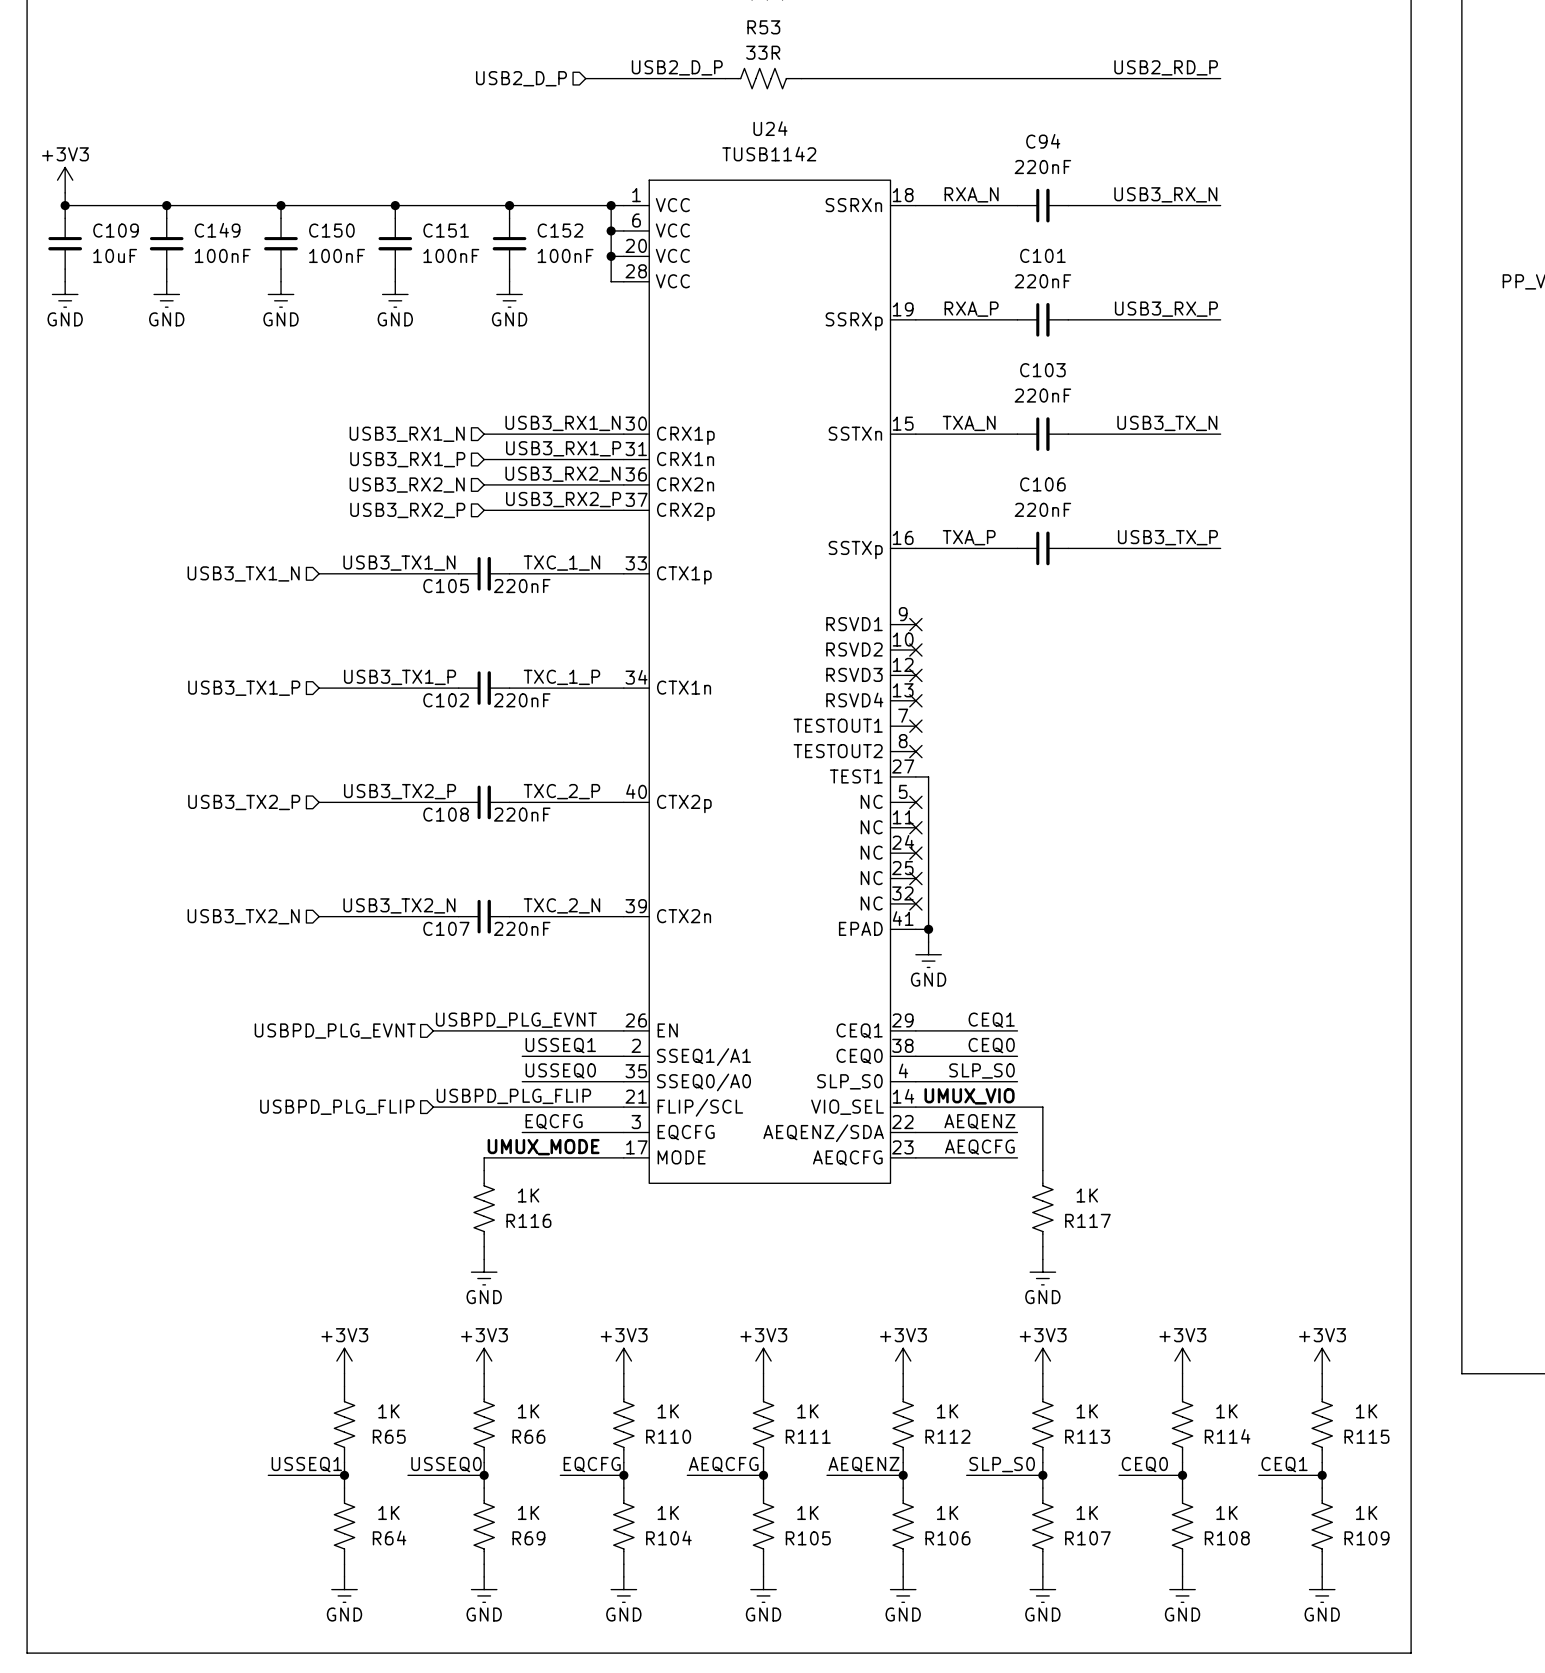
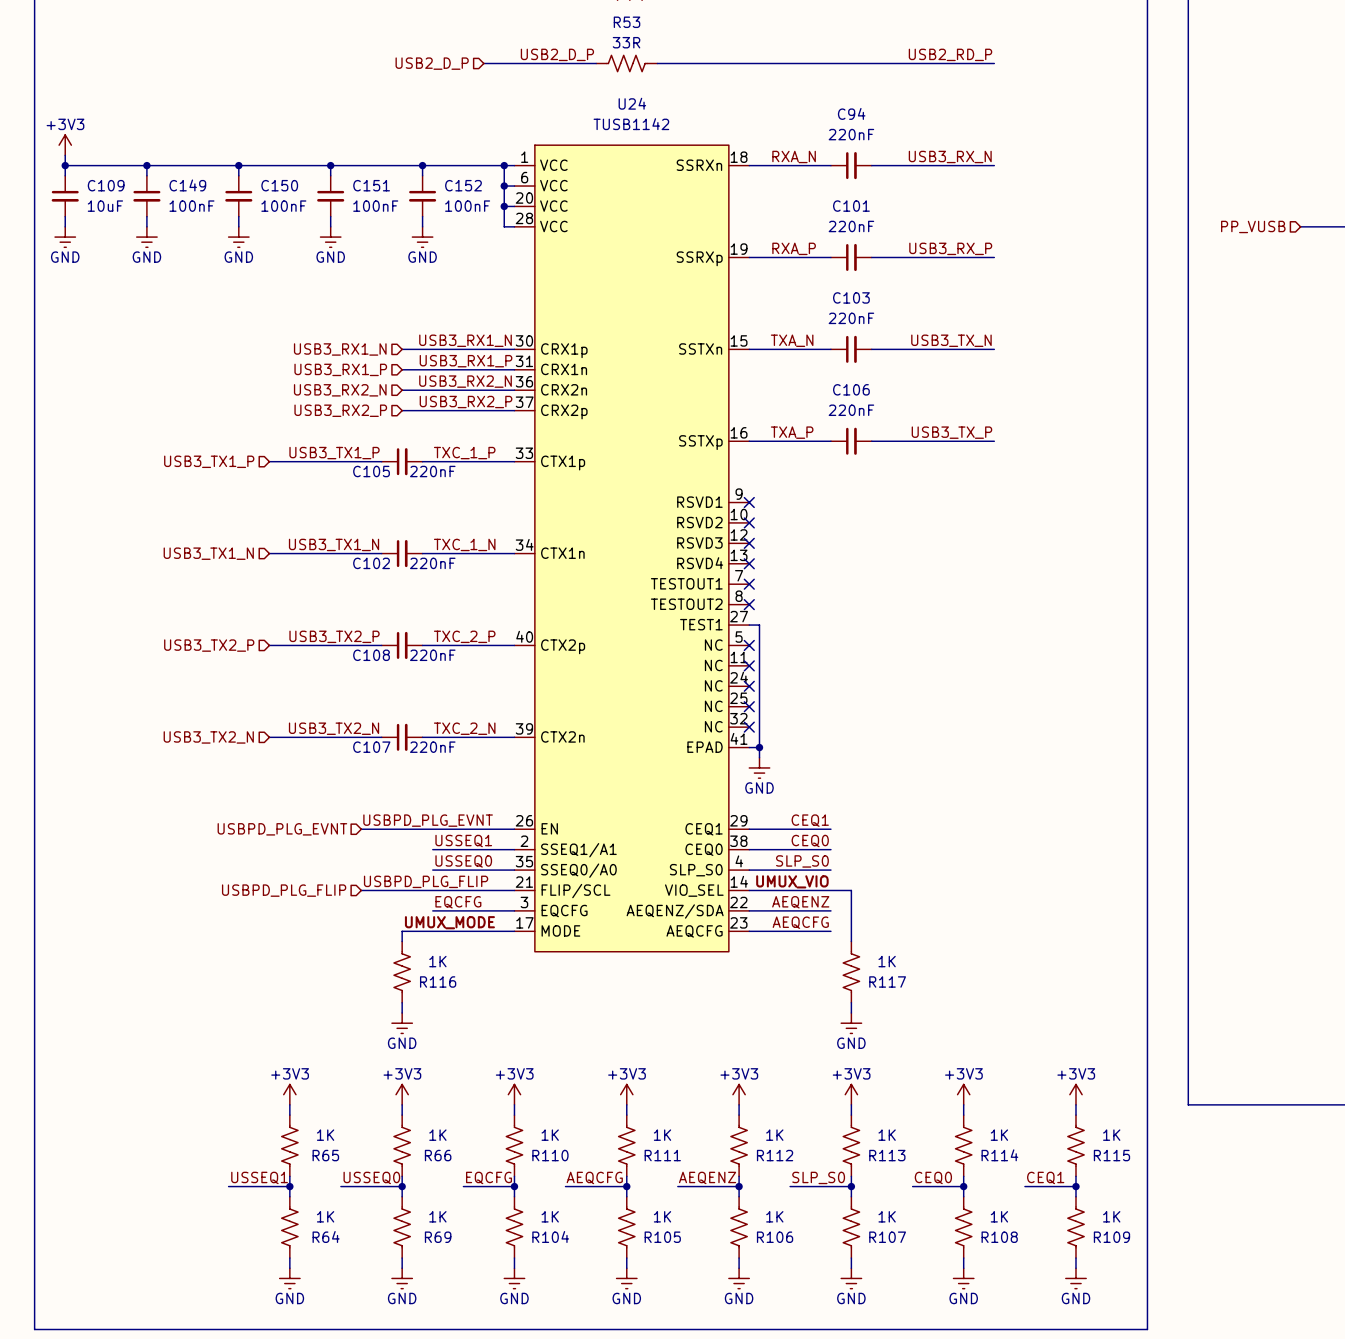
label: USB3_TX1_N (399, 563) -> USB3_TX1_P (334, 453)
label: TXC_1_N (561, 563) -> TXC_1_P (464, 453)
hierarchical label: USB3_TX1_N (243, 573) -> USB3_TX1_P (209, 461)
label: USB3_TX1_P (400, 677) -> USB3_TX1_N (334, 544)
label: TXC_1_P (561, 677) -> TXC_1_N (464, 544)
hierarchical label: USB3_TX1_P (244, 688) -> USB3_TX1_N (208, 553)

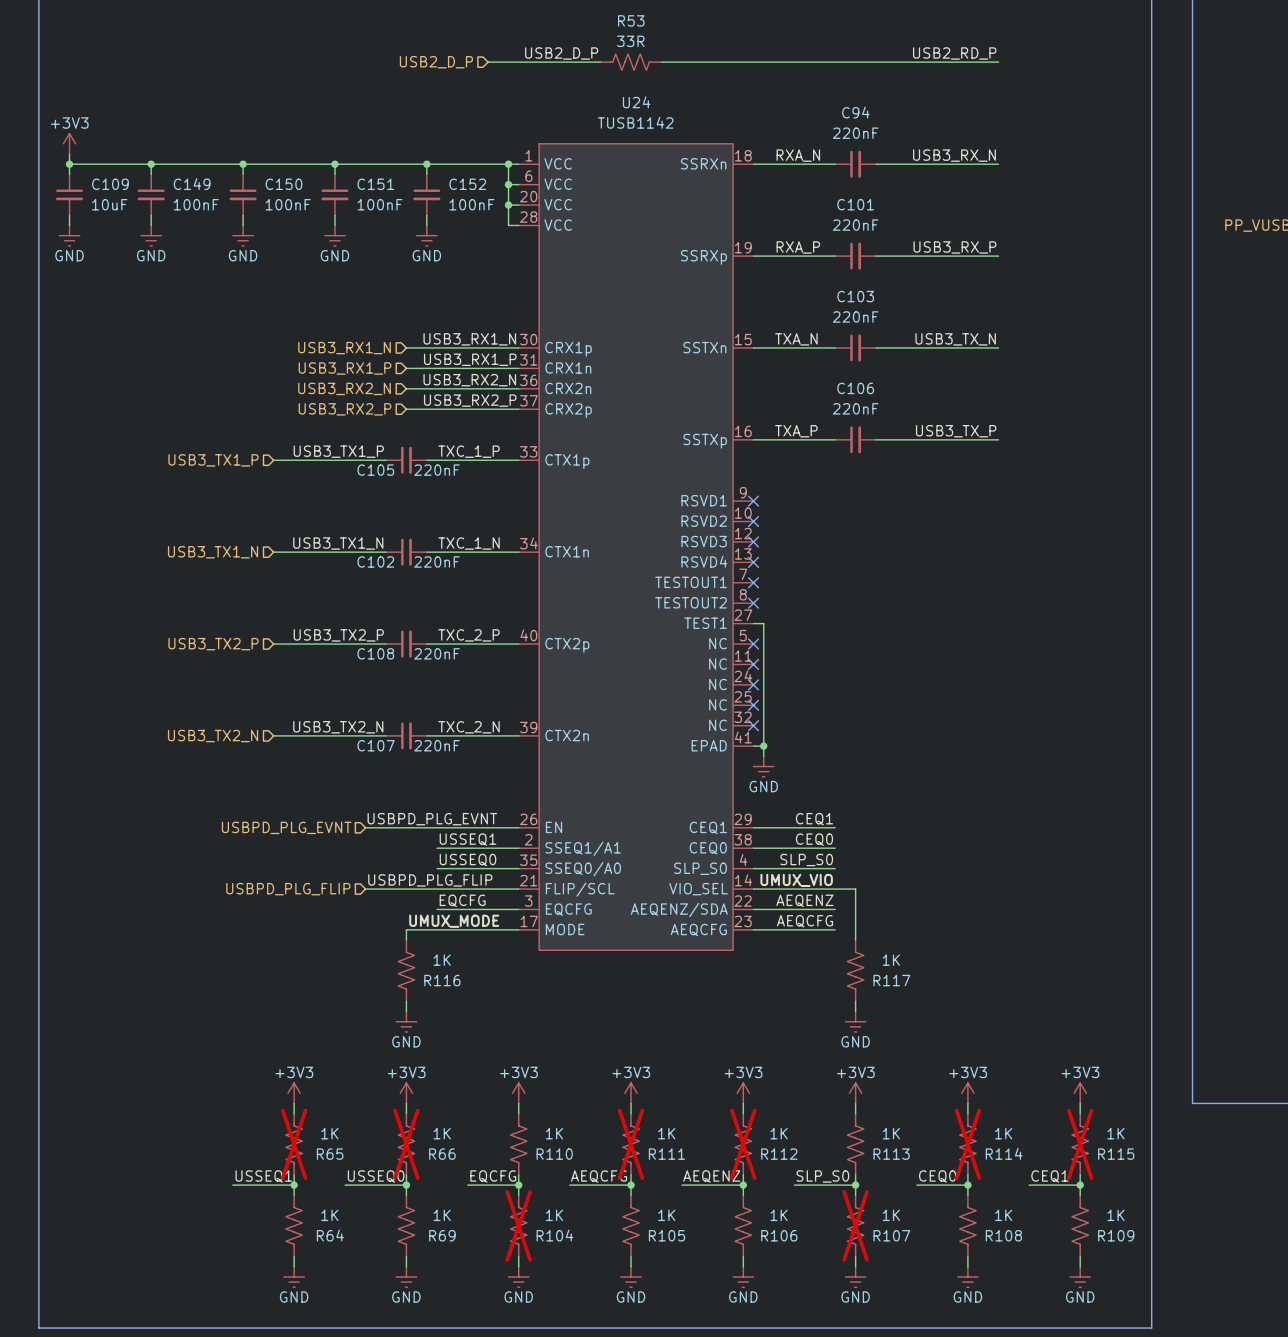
R65 do-not-place cross: none -> (294, 1144)
R66 do-not-place cross: none -> (406, 1144)
R111 do-not-place cross: none -> (631, 1144)
R112 do-not-place cross: none -> (743, 1144)
R114 do-not-place cross: none -> (967, 1144)
R115 do-not-place cross: none -> (1080, 1144)
R104 do-not-place cross: none -> (518, 1225)
R107 do-not-place cross: none -> (855, 1225)

